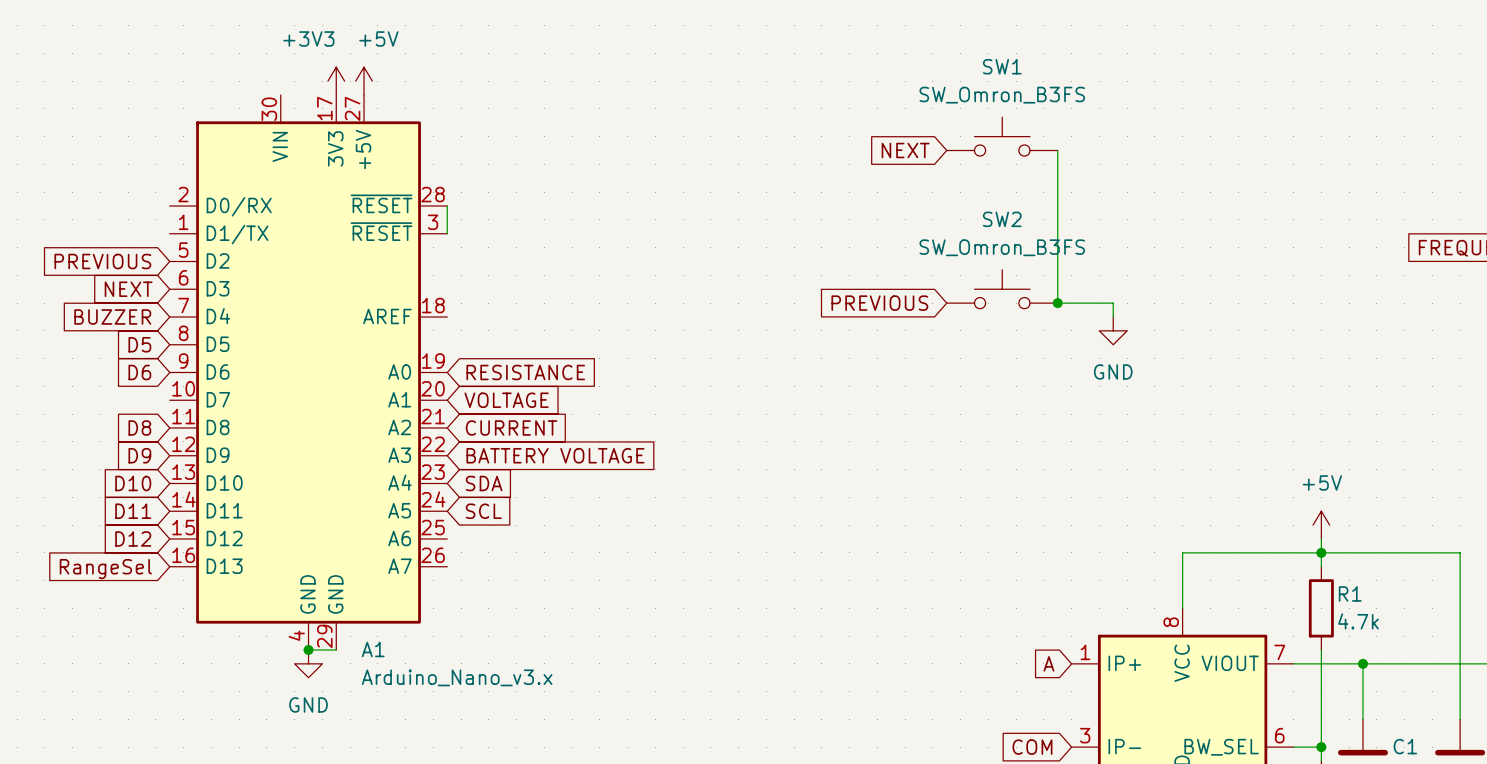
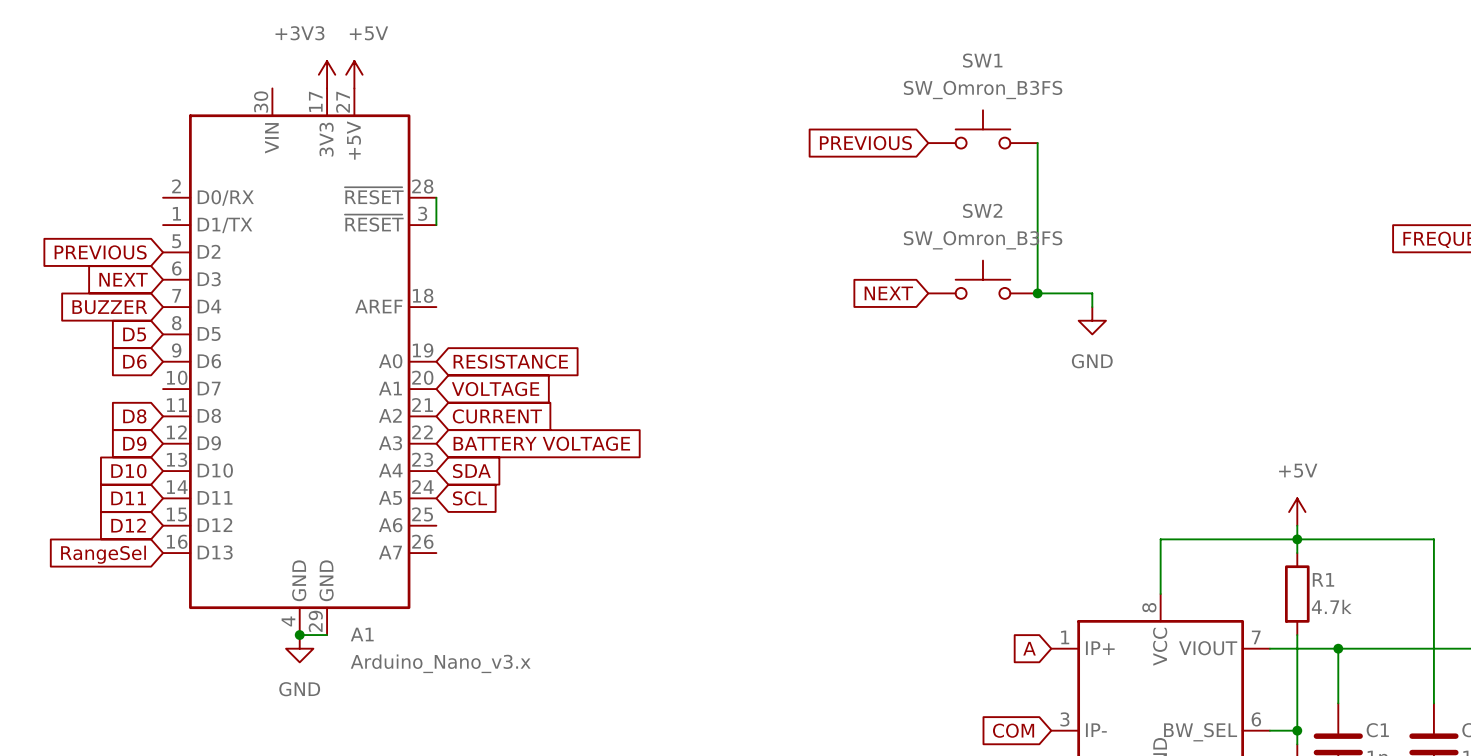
global label: NEXT (905, 150) -> PREVIOUS (865, 143)
global label: PREVIOUS (879, 303) -> NEXT (888, 293)

